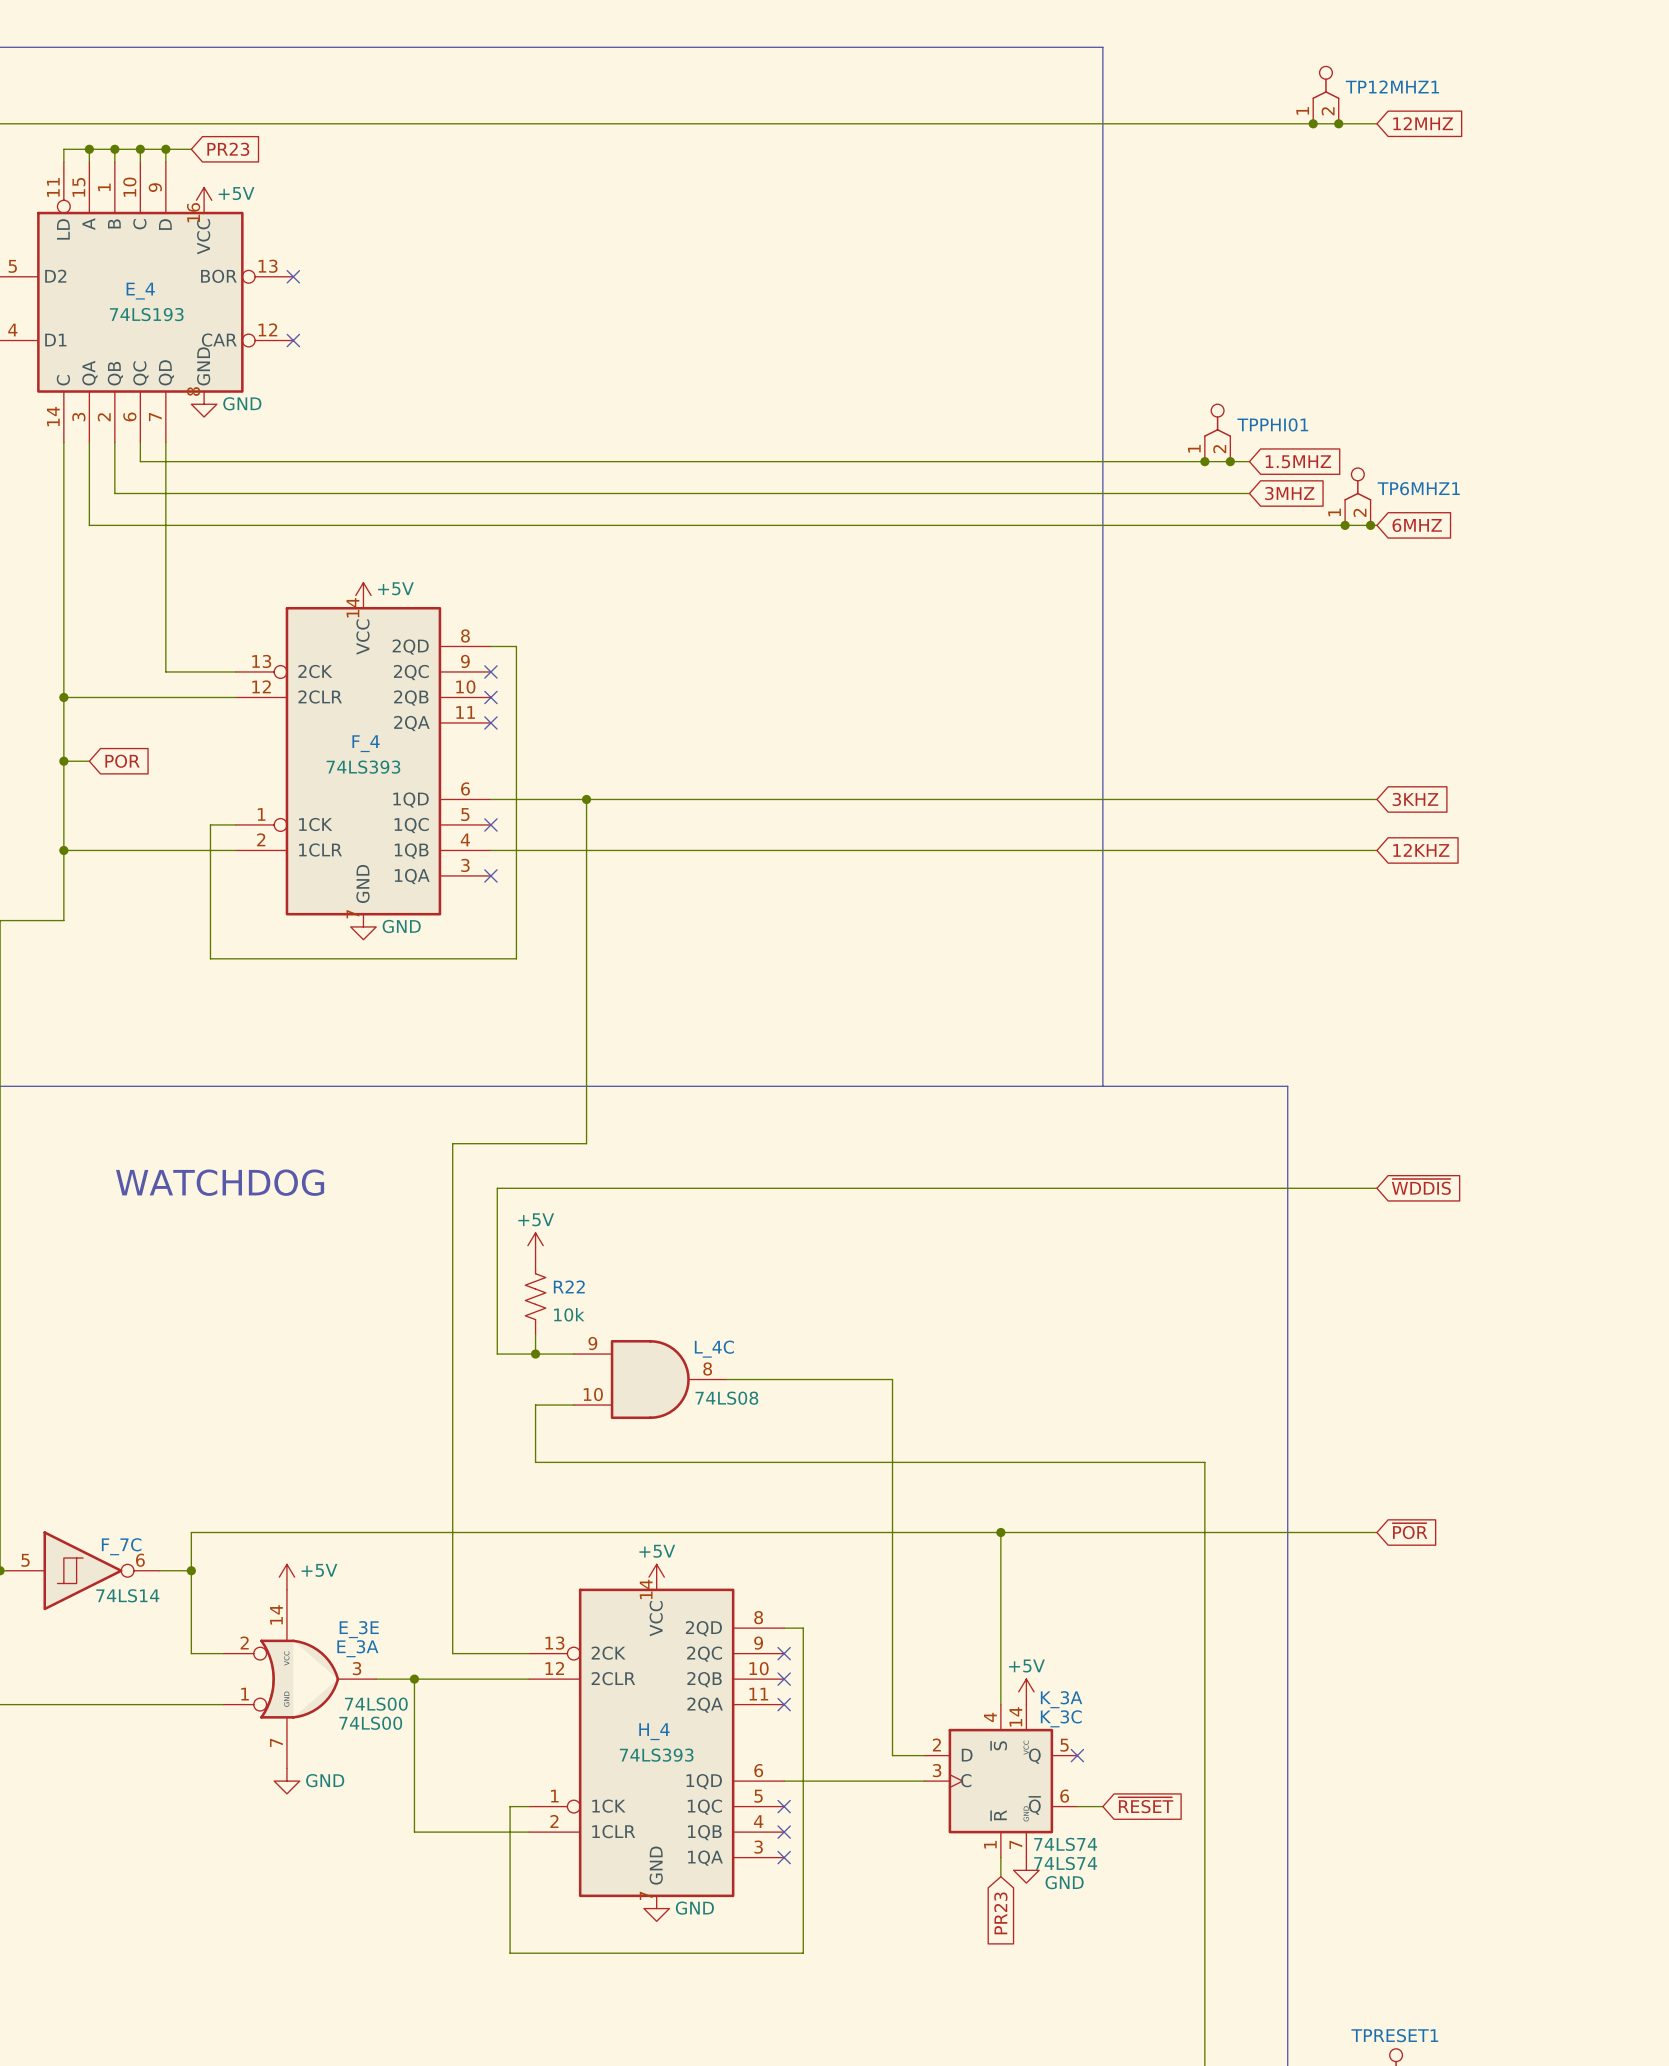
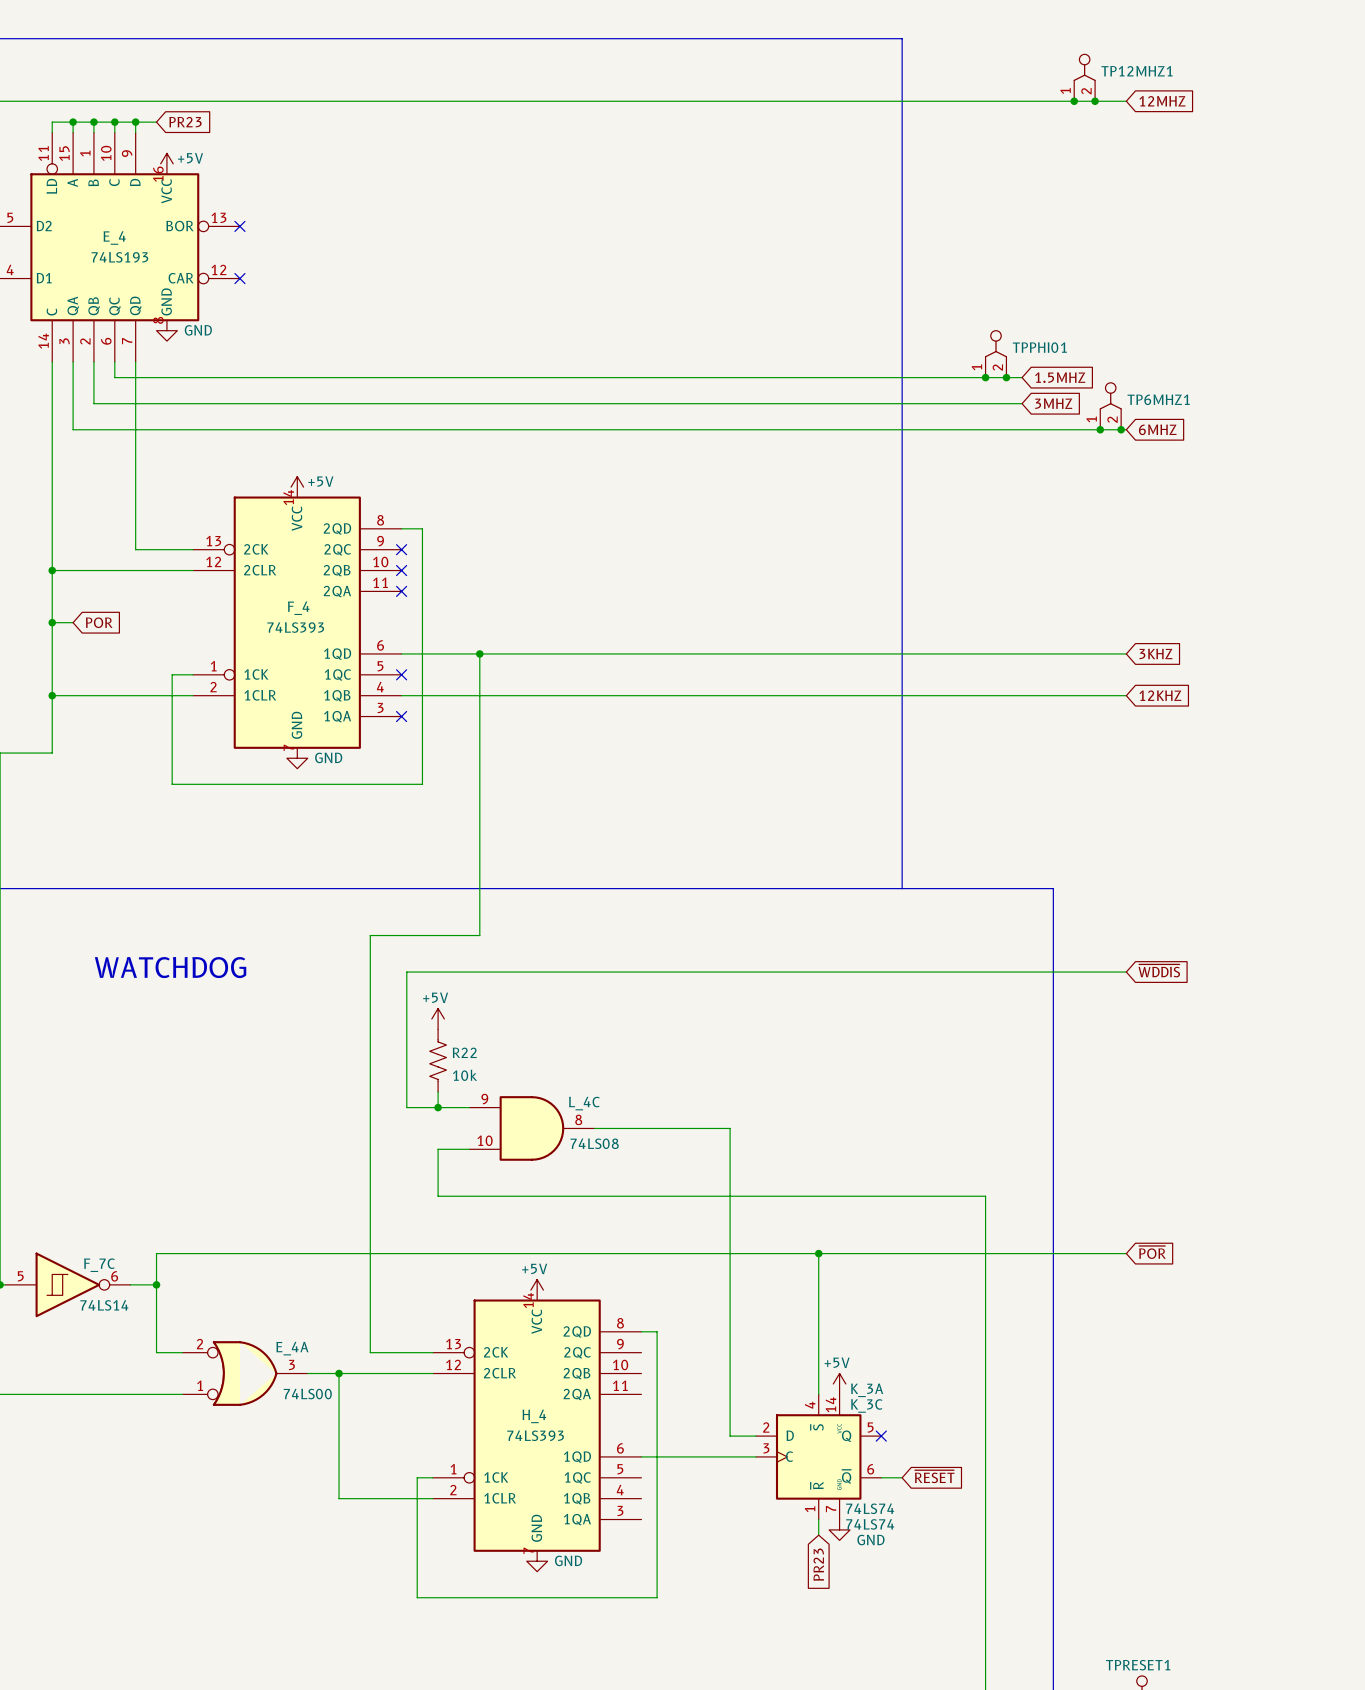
power symbol: +5V (286, 1577) -> none
E_3A name: E_3A (357, 1648) -> E_4A (292, 1348)
no-connect mark: (784, 1653) -> none
E_3E: 74LS00 (286, 1679) -> none
no-connect mark: (784, 1679) -> none
no-connect mark: (784, 1704) -> none
power symbol: GND (286, 1781) -> none
no-connect mark: (784, 1806) -> none
no-connect mark: (784, 1832) -> none
no-connect mark: (784, 1857) -> none

